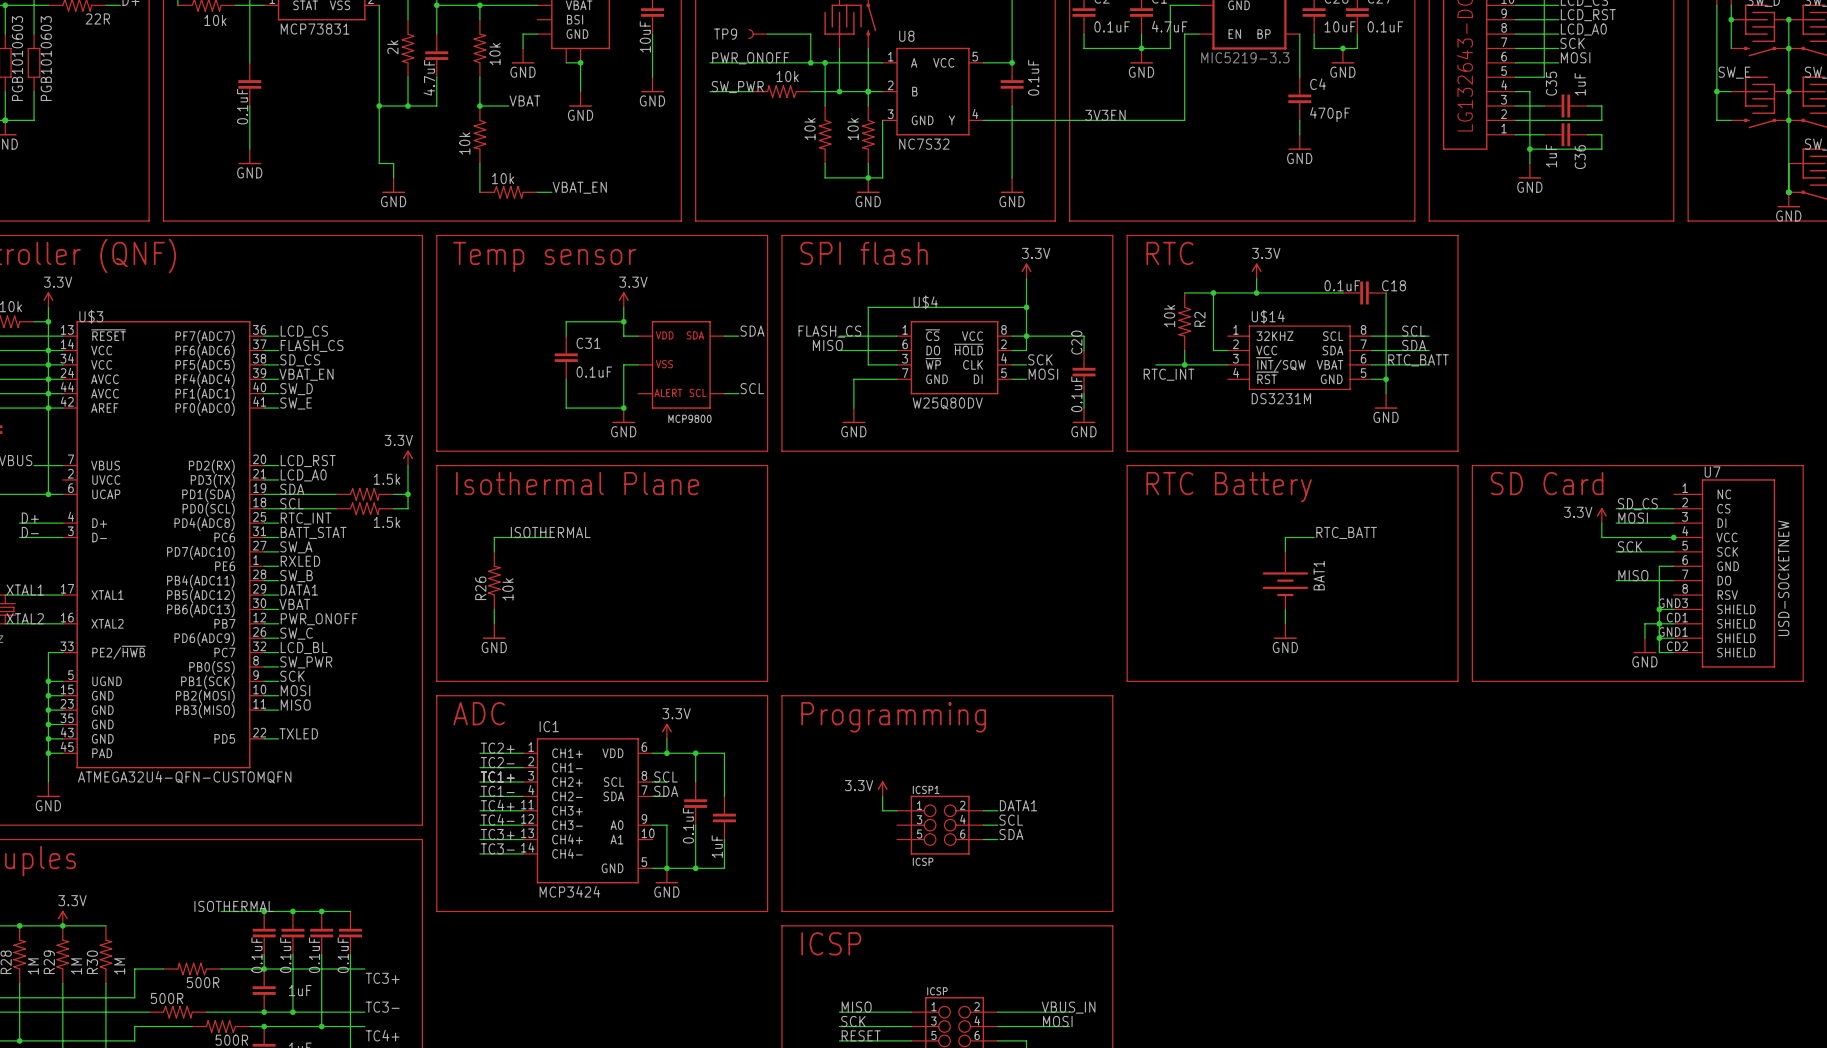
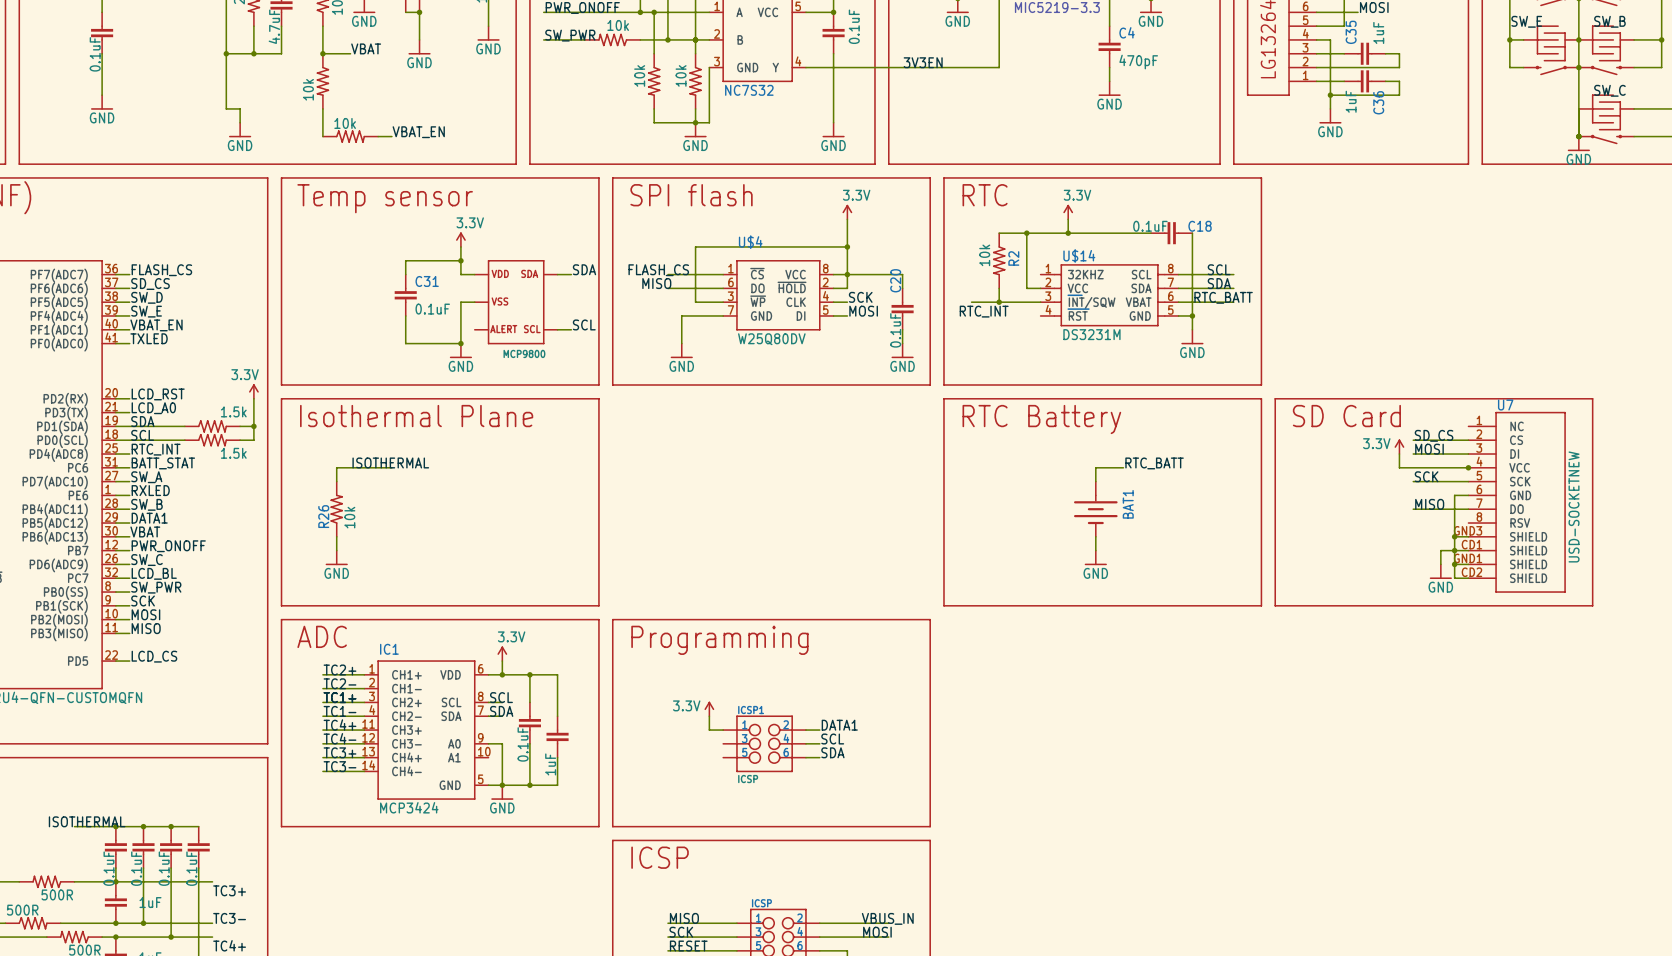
label: LCD_CS (304, 331) -> FLASH_CS (161, 270)
label: FLASH_CS (312, 345) -> SD_CS (150, 284)
label: SD_CS (300, 360) -> SW_D (146, 297)
label: VBAT_EN (306, 374) -> SW_E (146, 311)
label: SW_D (296, 389) -> VBAT_EN (156, 325)
label: SW_E (296, 403) -> TXLED (149, 338)
label: TXLED (298, 733) -> LCD_CS (154, 656)

